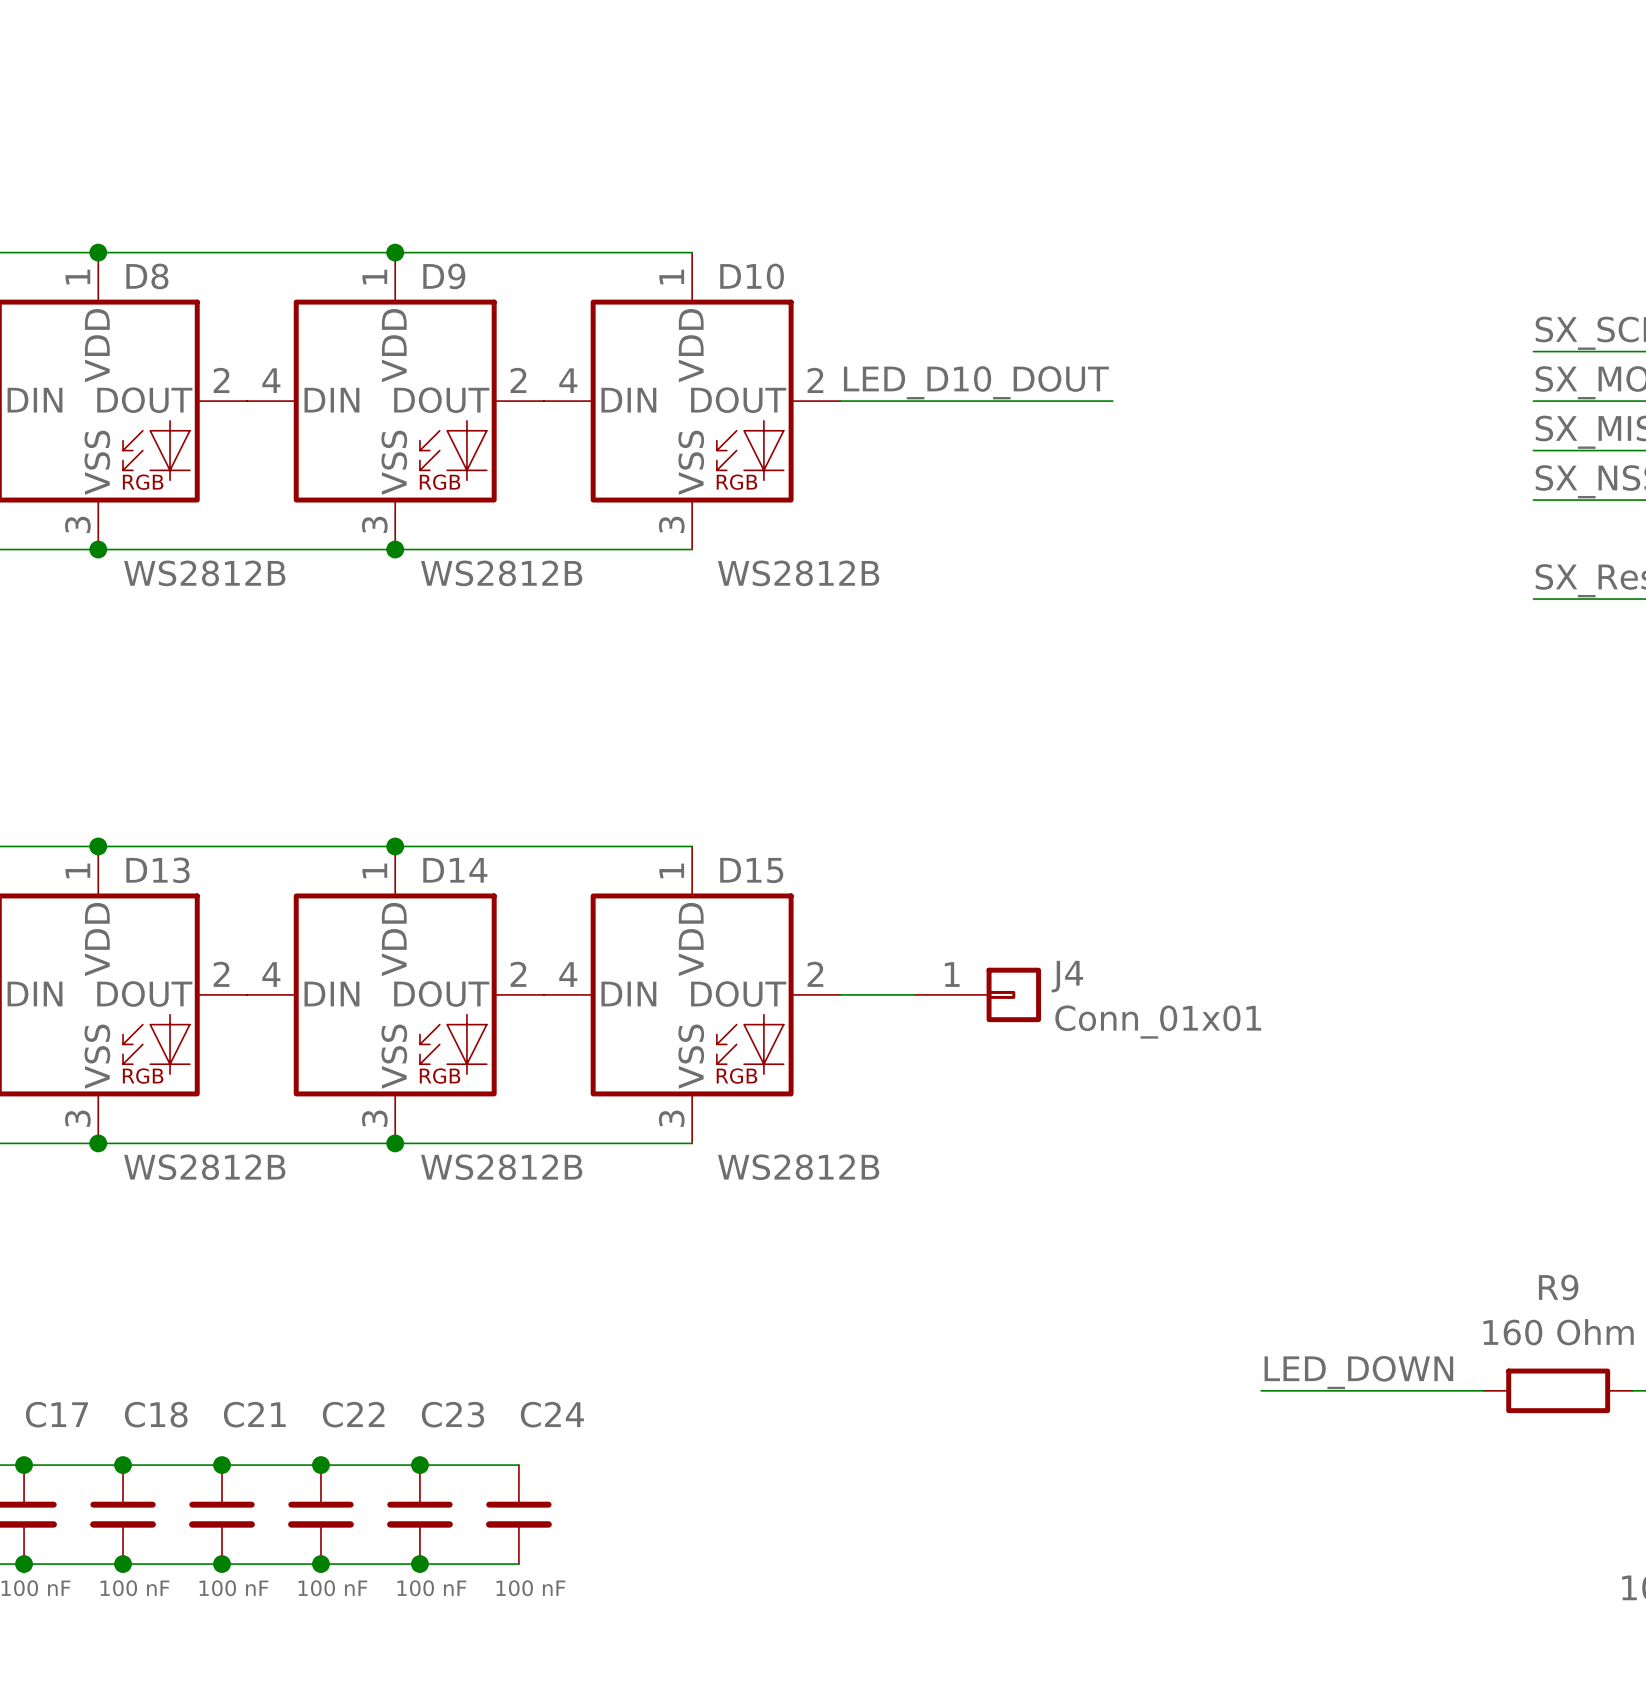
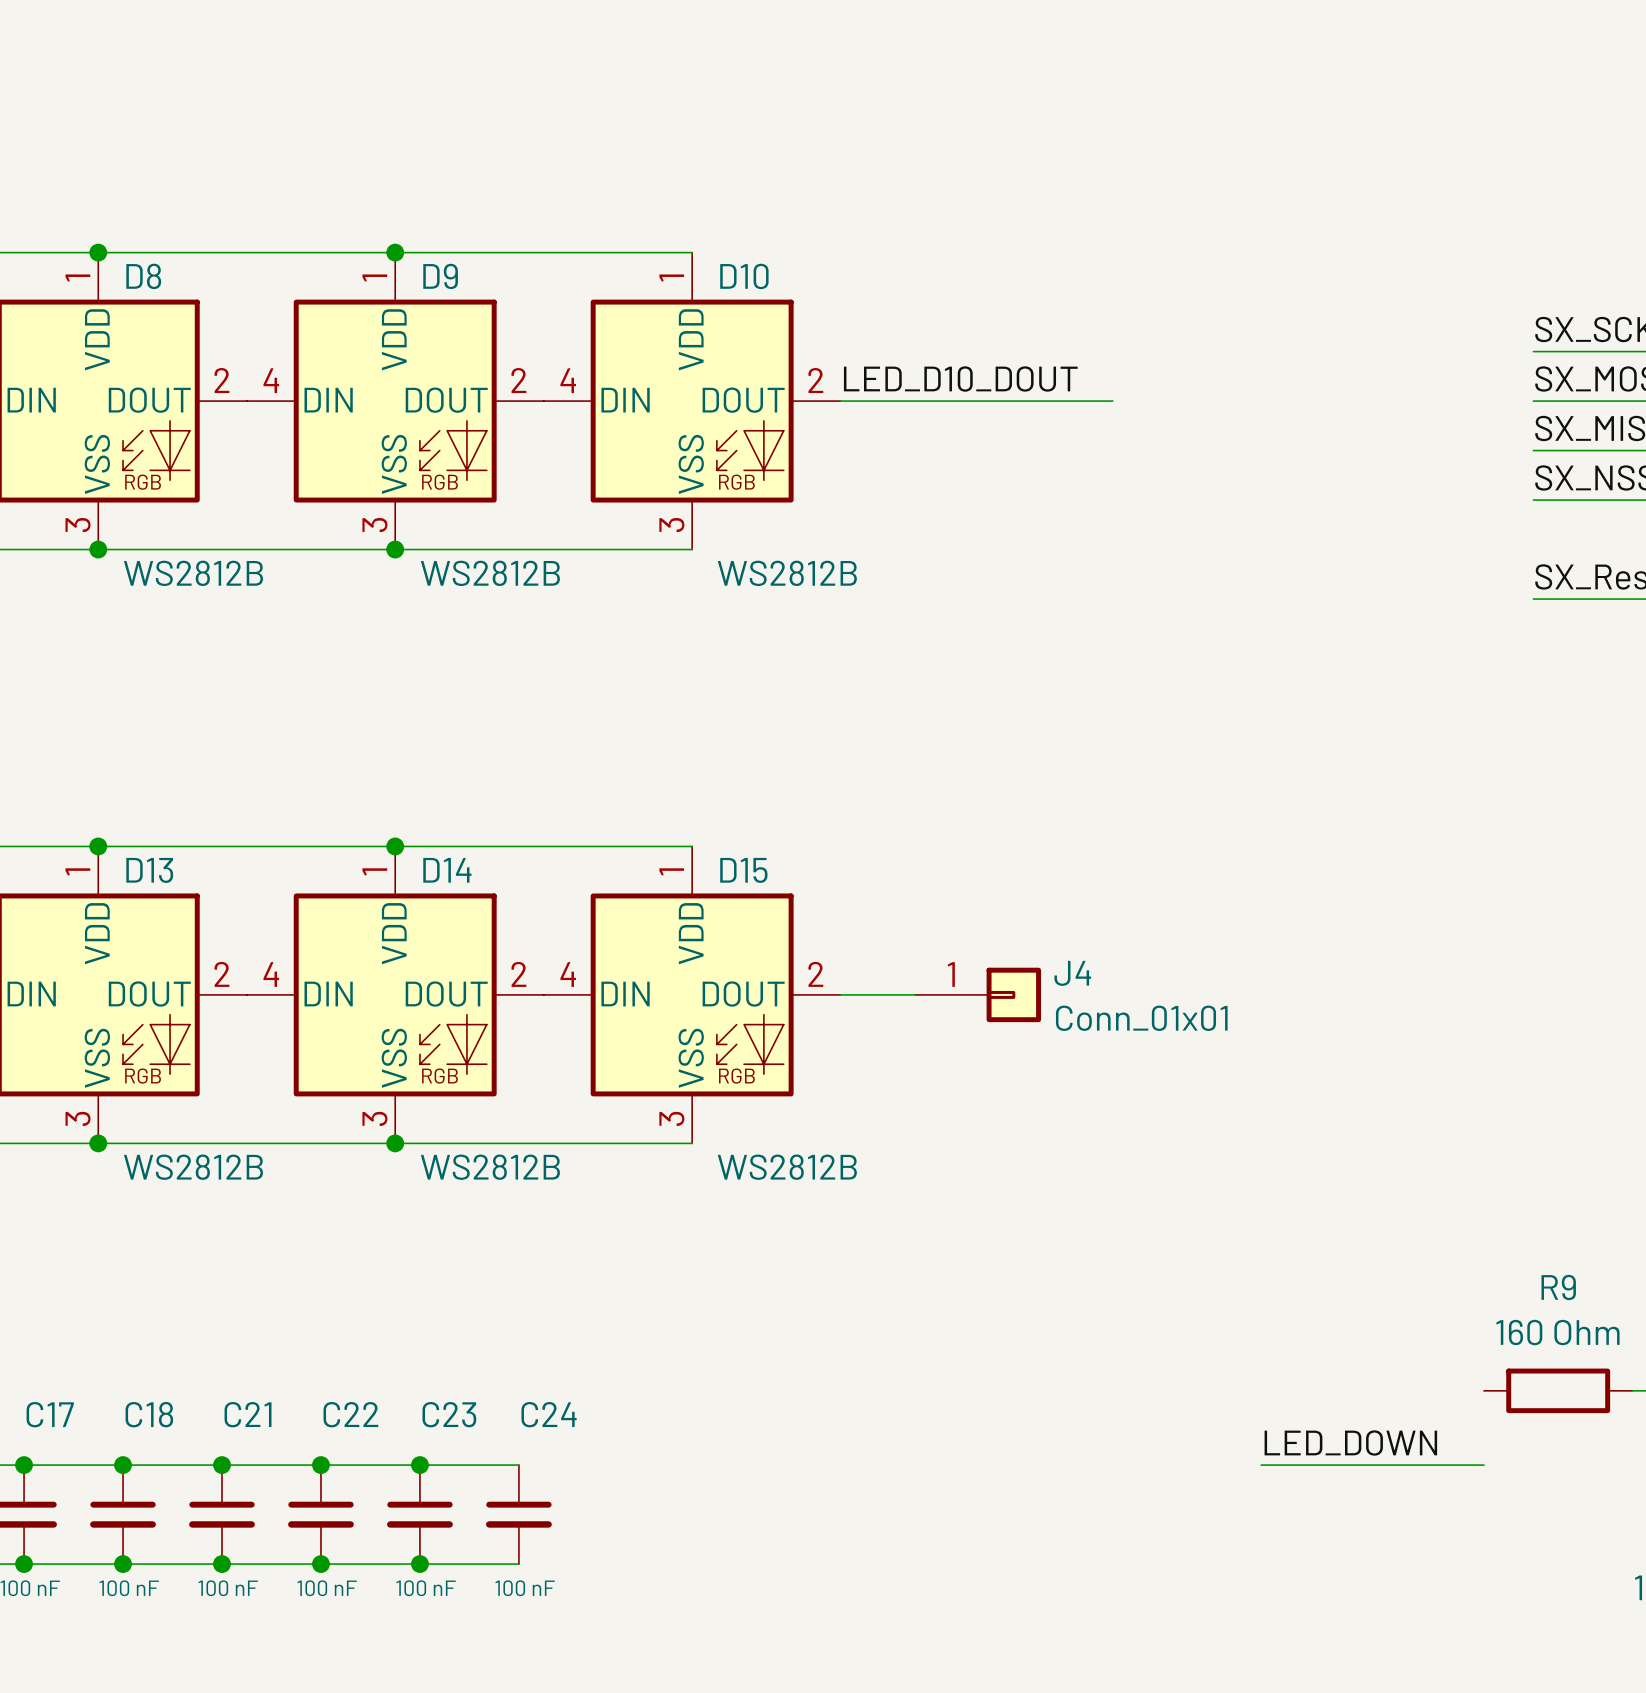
label position: LED_DOWN (1358, 1372) -> LED_DOWN (1350, 1442)
wire: (1261, 1390) (1483, 1390) -> (1261, 1465) (1483, 1465)

